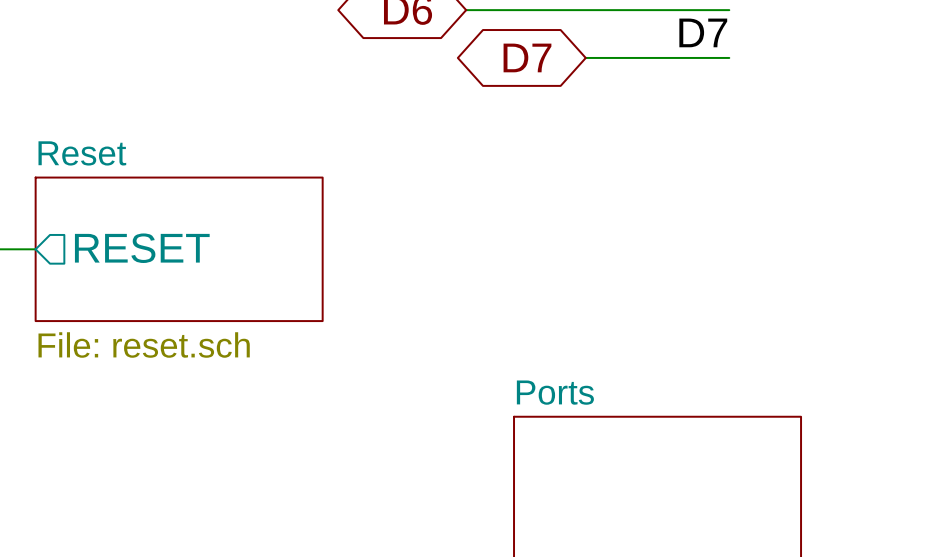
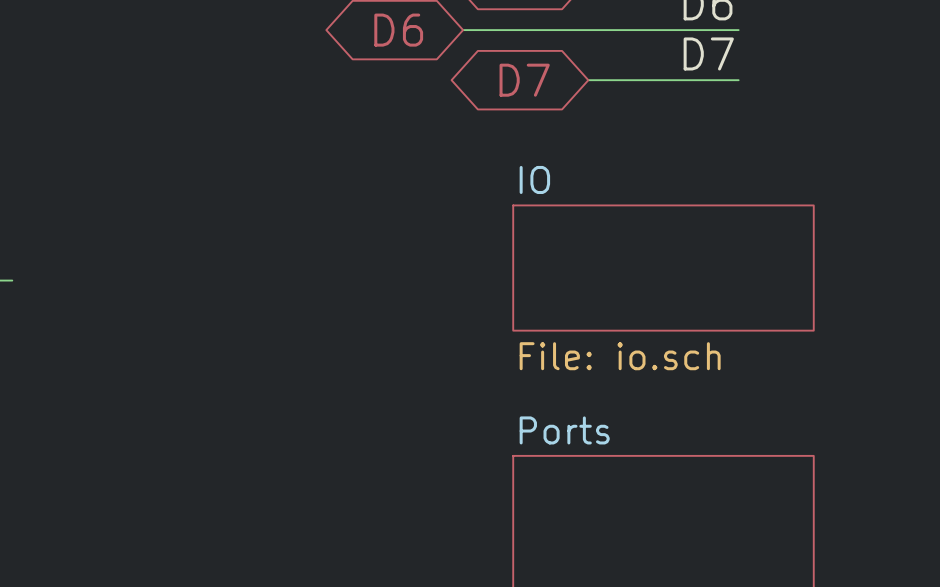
sheet IO: none -> File: io.sch (663, 268)
sheet pin: RESET (142, 248) -> none
sheet Reset: File: reset.sch (179, 249) -> none

